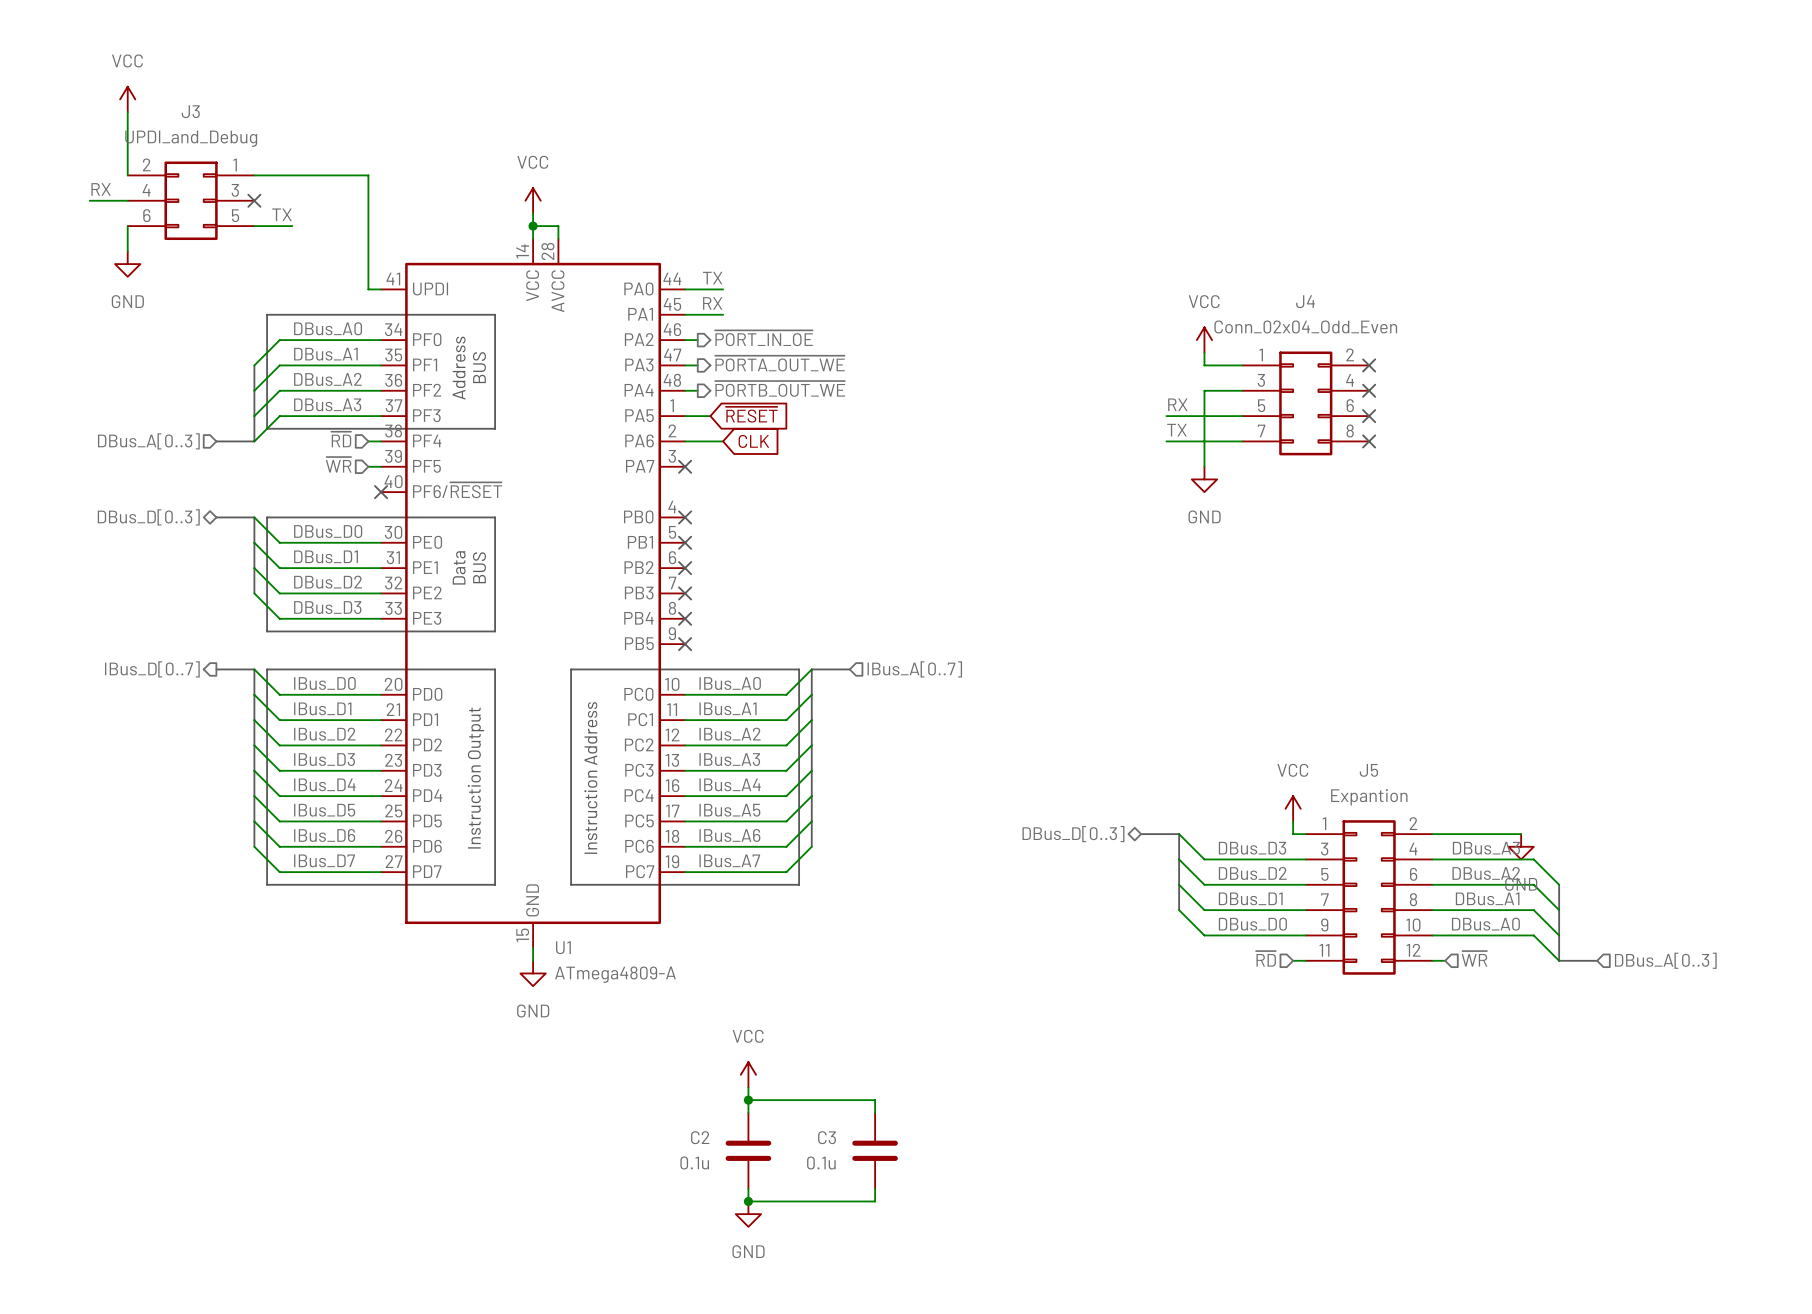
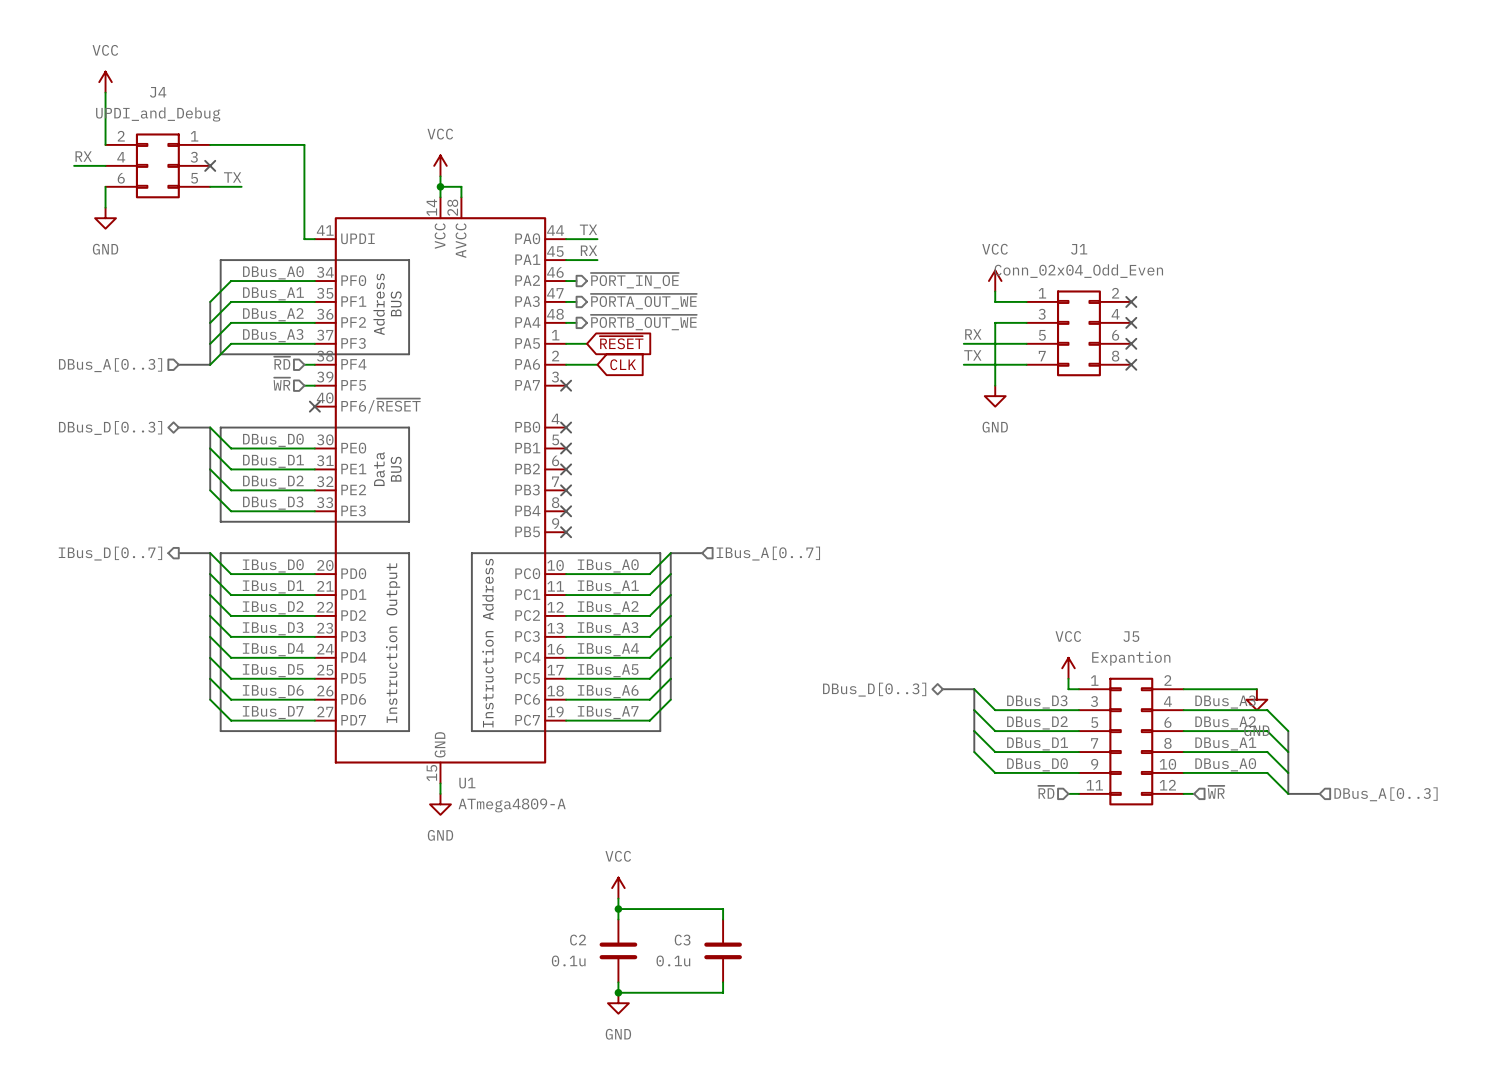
J3 name: J3 (190, 111) -> J4 (158, 92)
J4 name: J4 (1305, 301) -> J1 (1079, 249)

